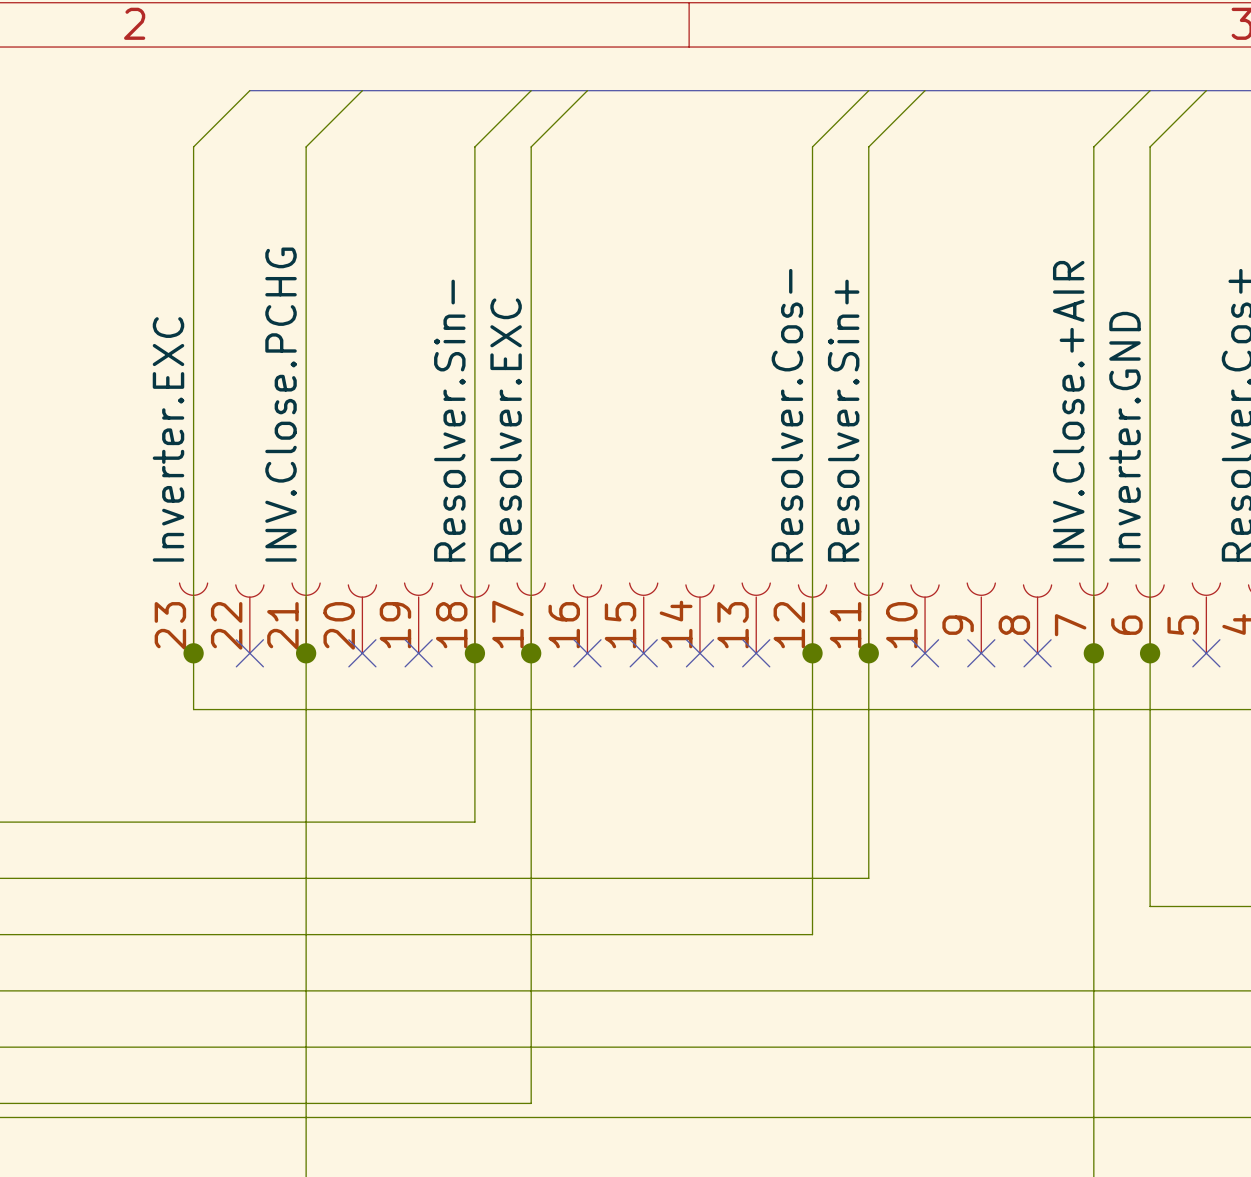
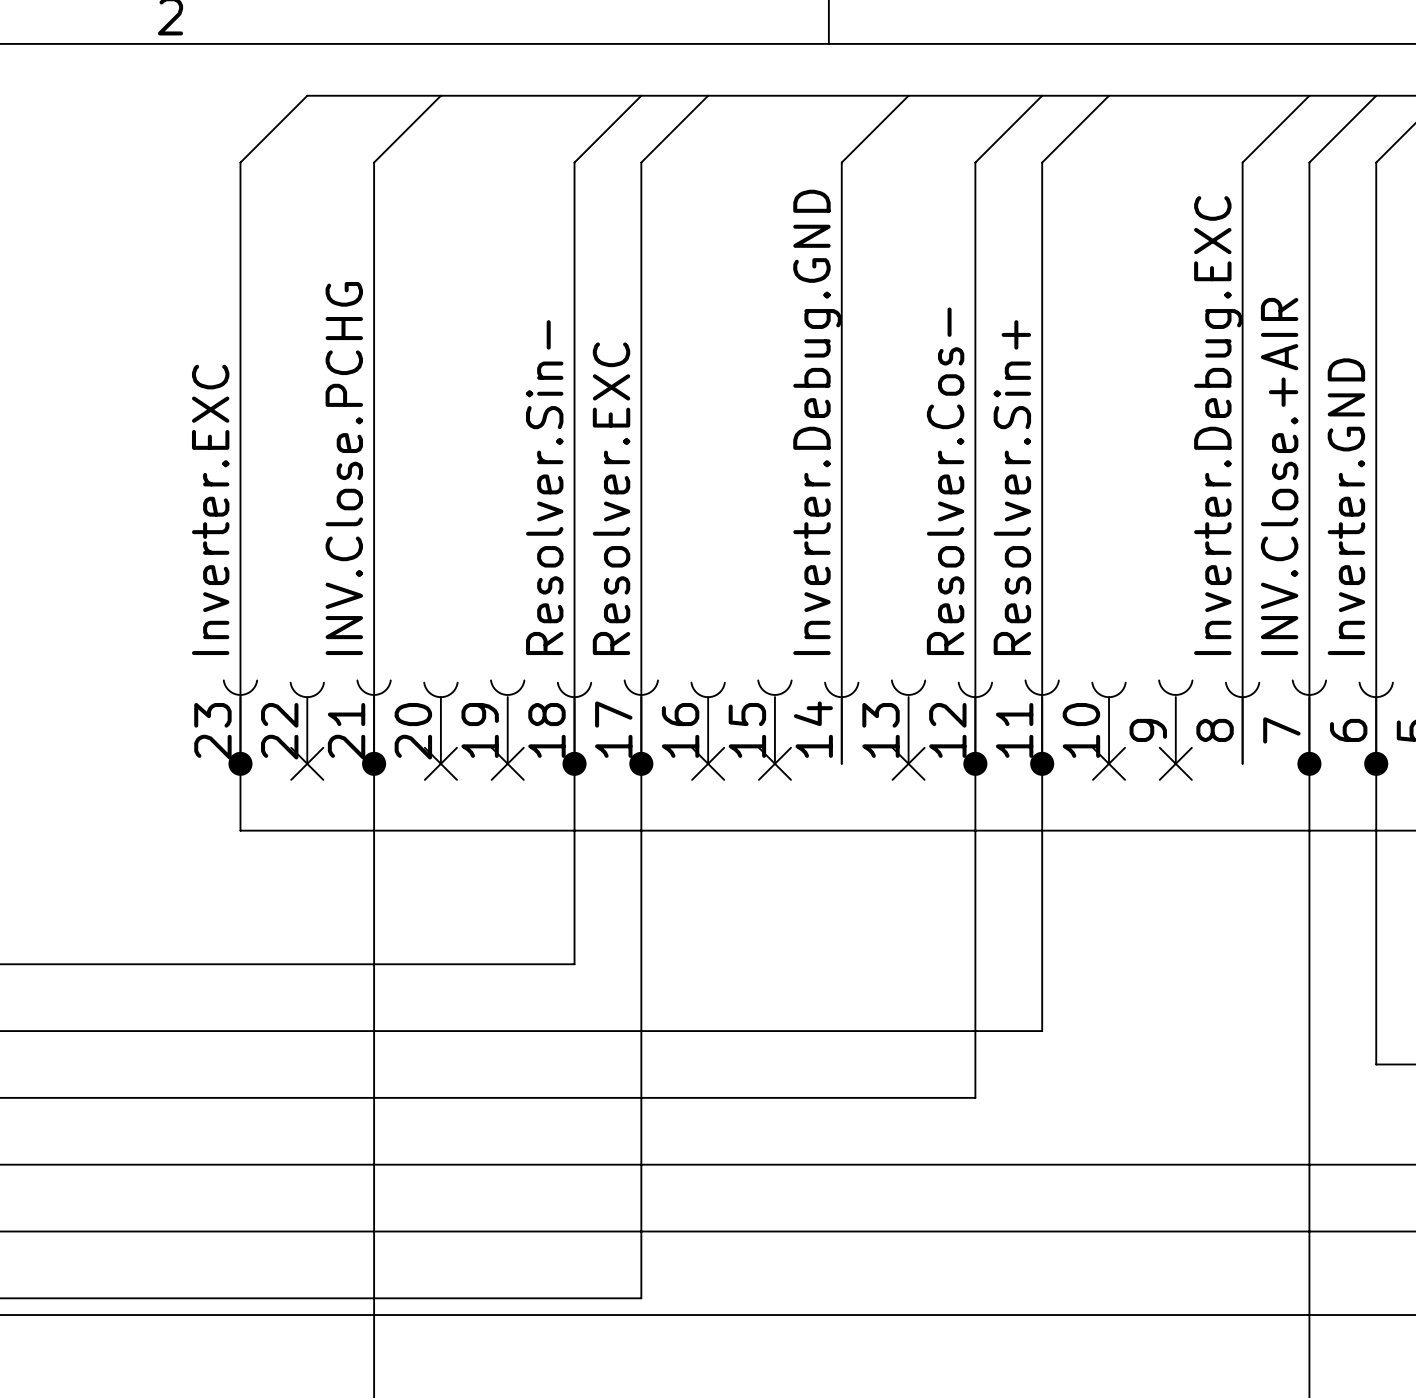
wire: none -> (908, 95) (841, 162) (841, 763)
wire: none -> (1309, 95) (1242, 162) (1242, 763)
label: none -> Inverter.Debug.GND (817, 422)
label: none -> Inverter.Debug.EXC (1218, 425)
no-connect mark: (699, 653) -> none
no-connect mark: (1037, 653) -> none

